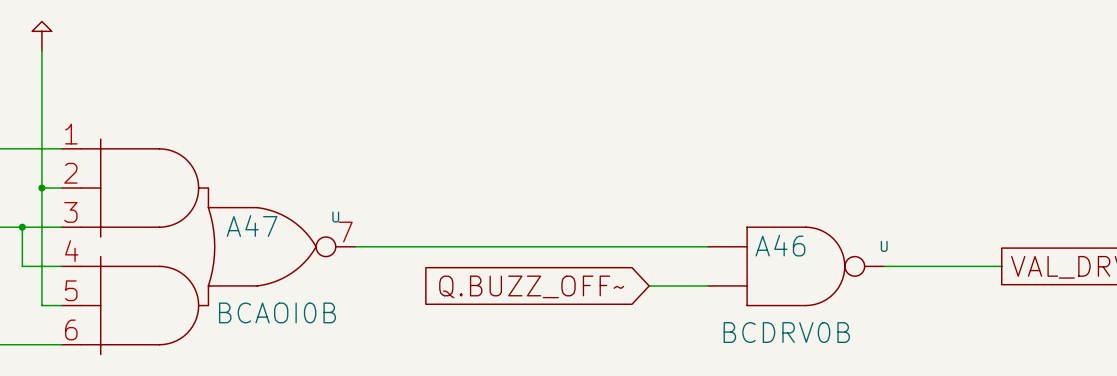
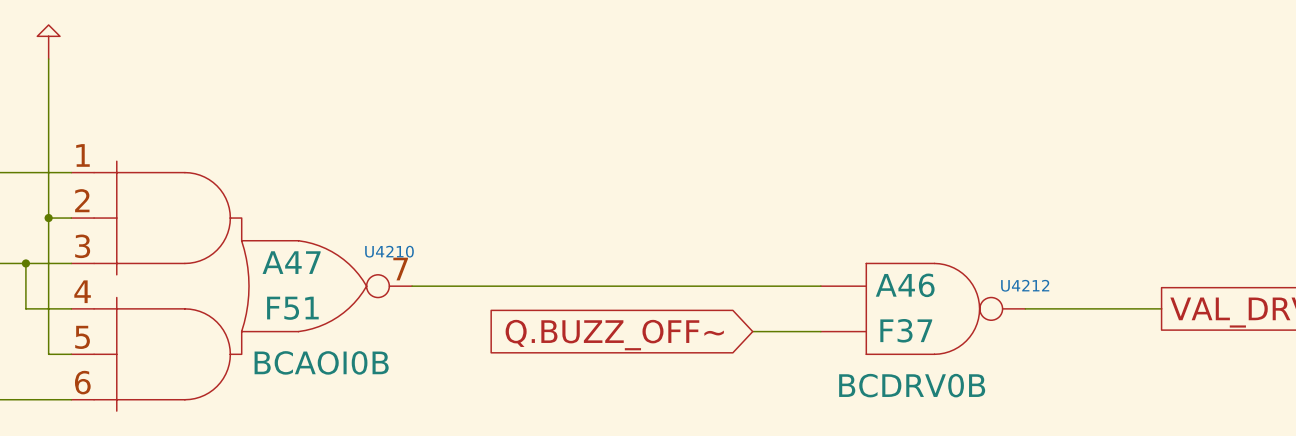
U name: U (335, 217) -> U4210 (389, 251)
U name: U (884, 246) -> U4212 (1025, 285)
U value: none -> F51 (292, 308)
U value: none -> F37 (906, 330)

